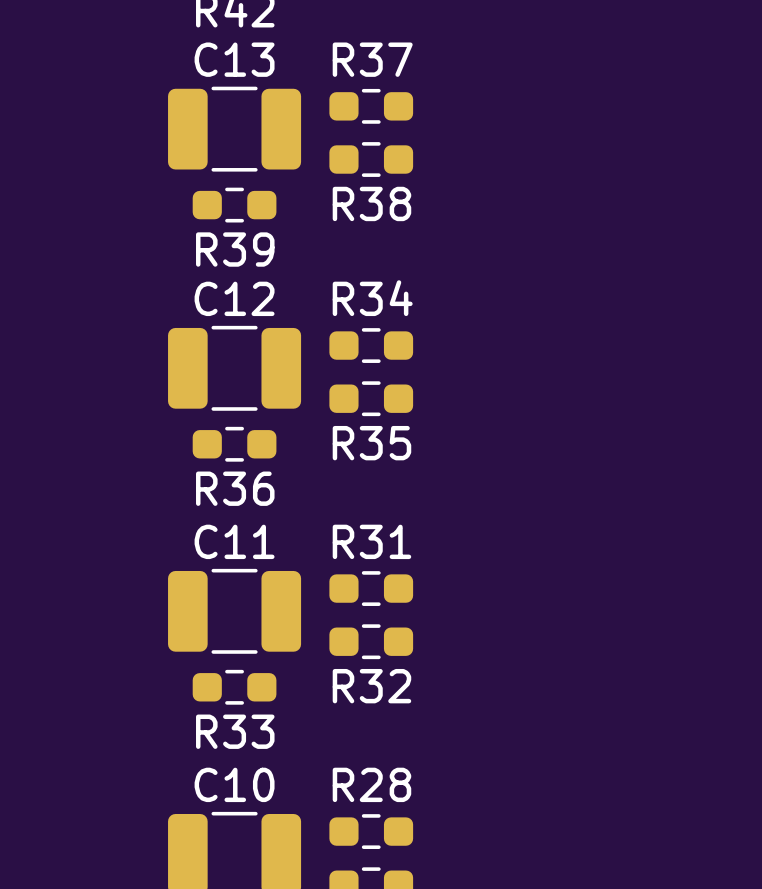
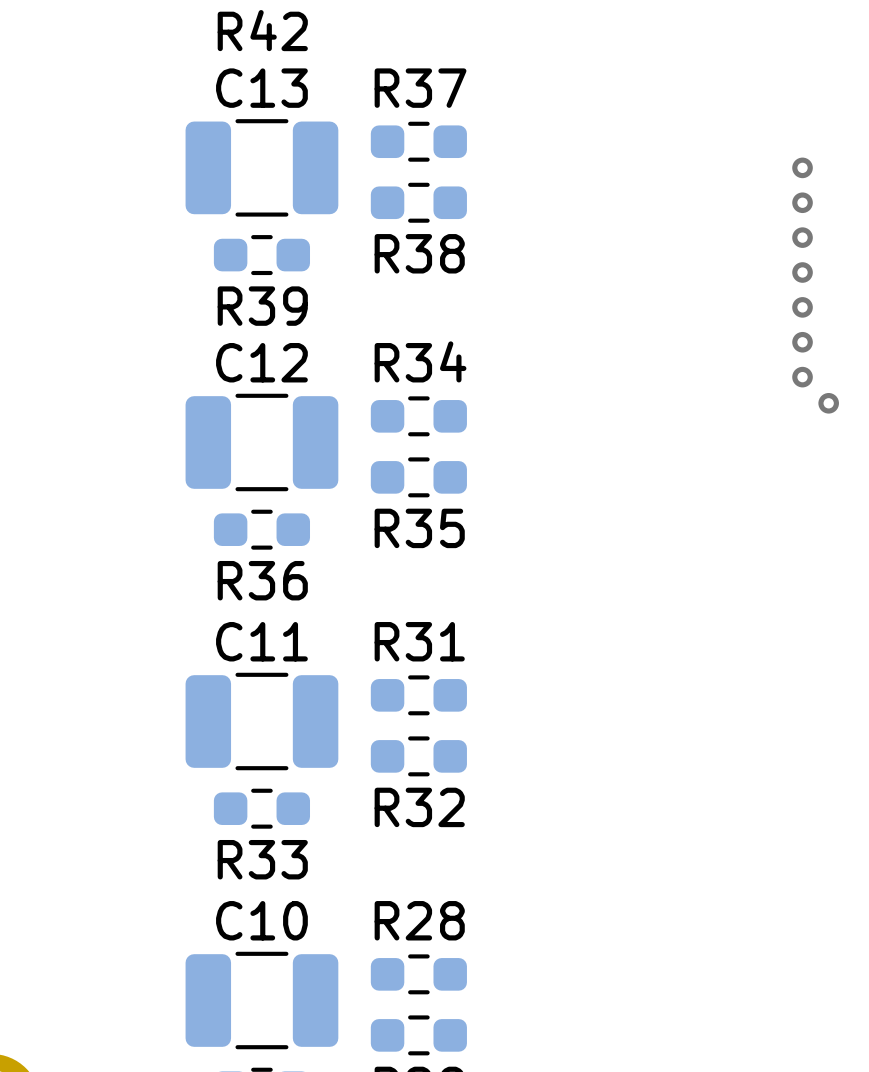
via: none -> (802, 167)
via: none -> (802, 202)
via: none -> (802, 237)
via: none -> (802, 272)
via: none -> (802, 307)
via: none -> (802, 342)
via: none -> (802, 377)
via: none -> (828, 403)

